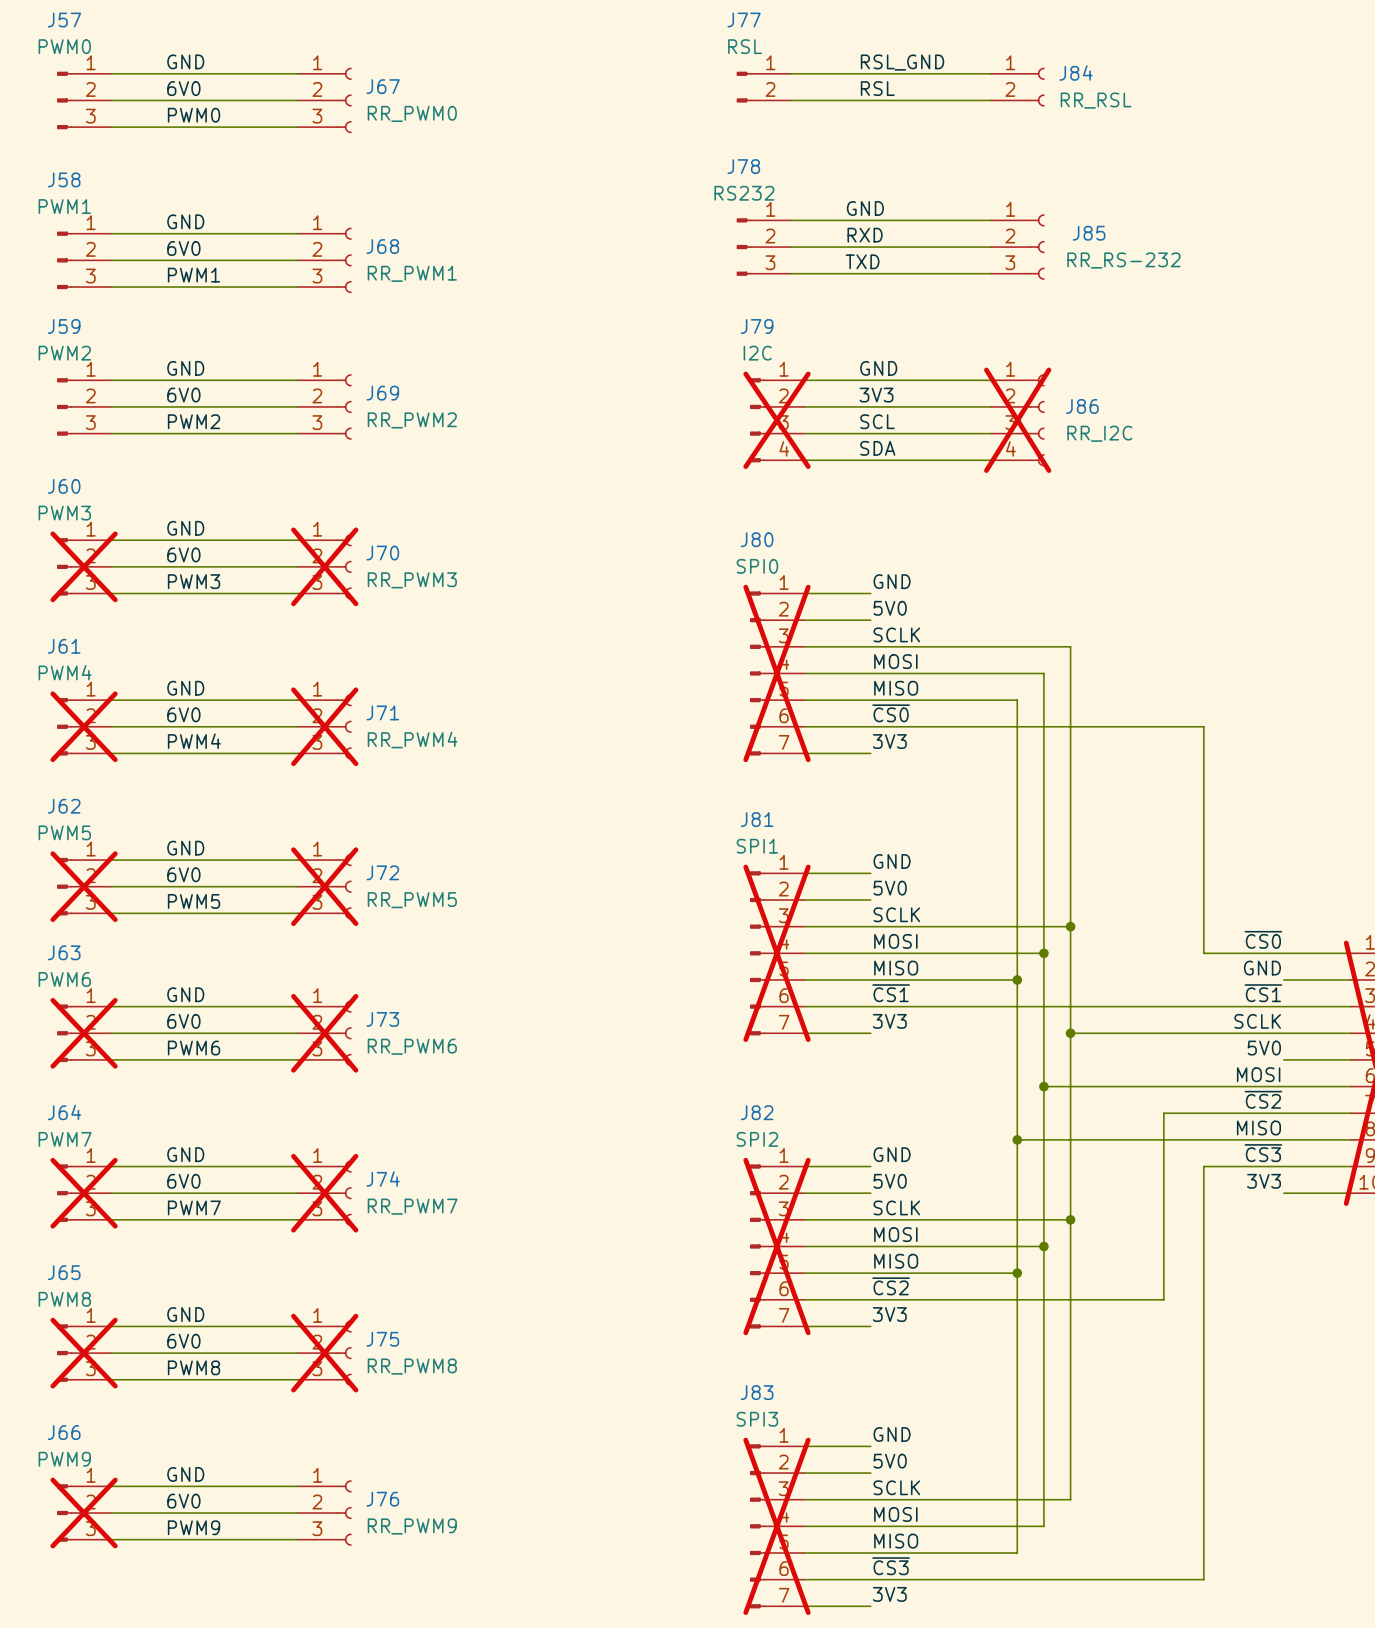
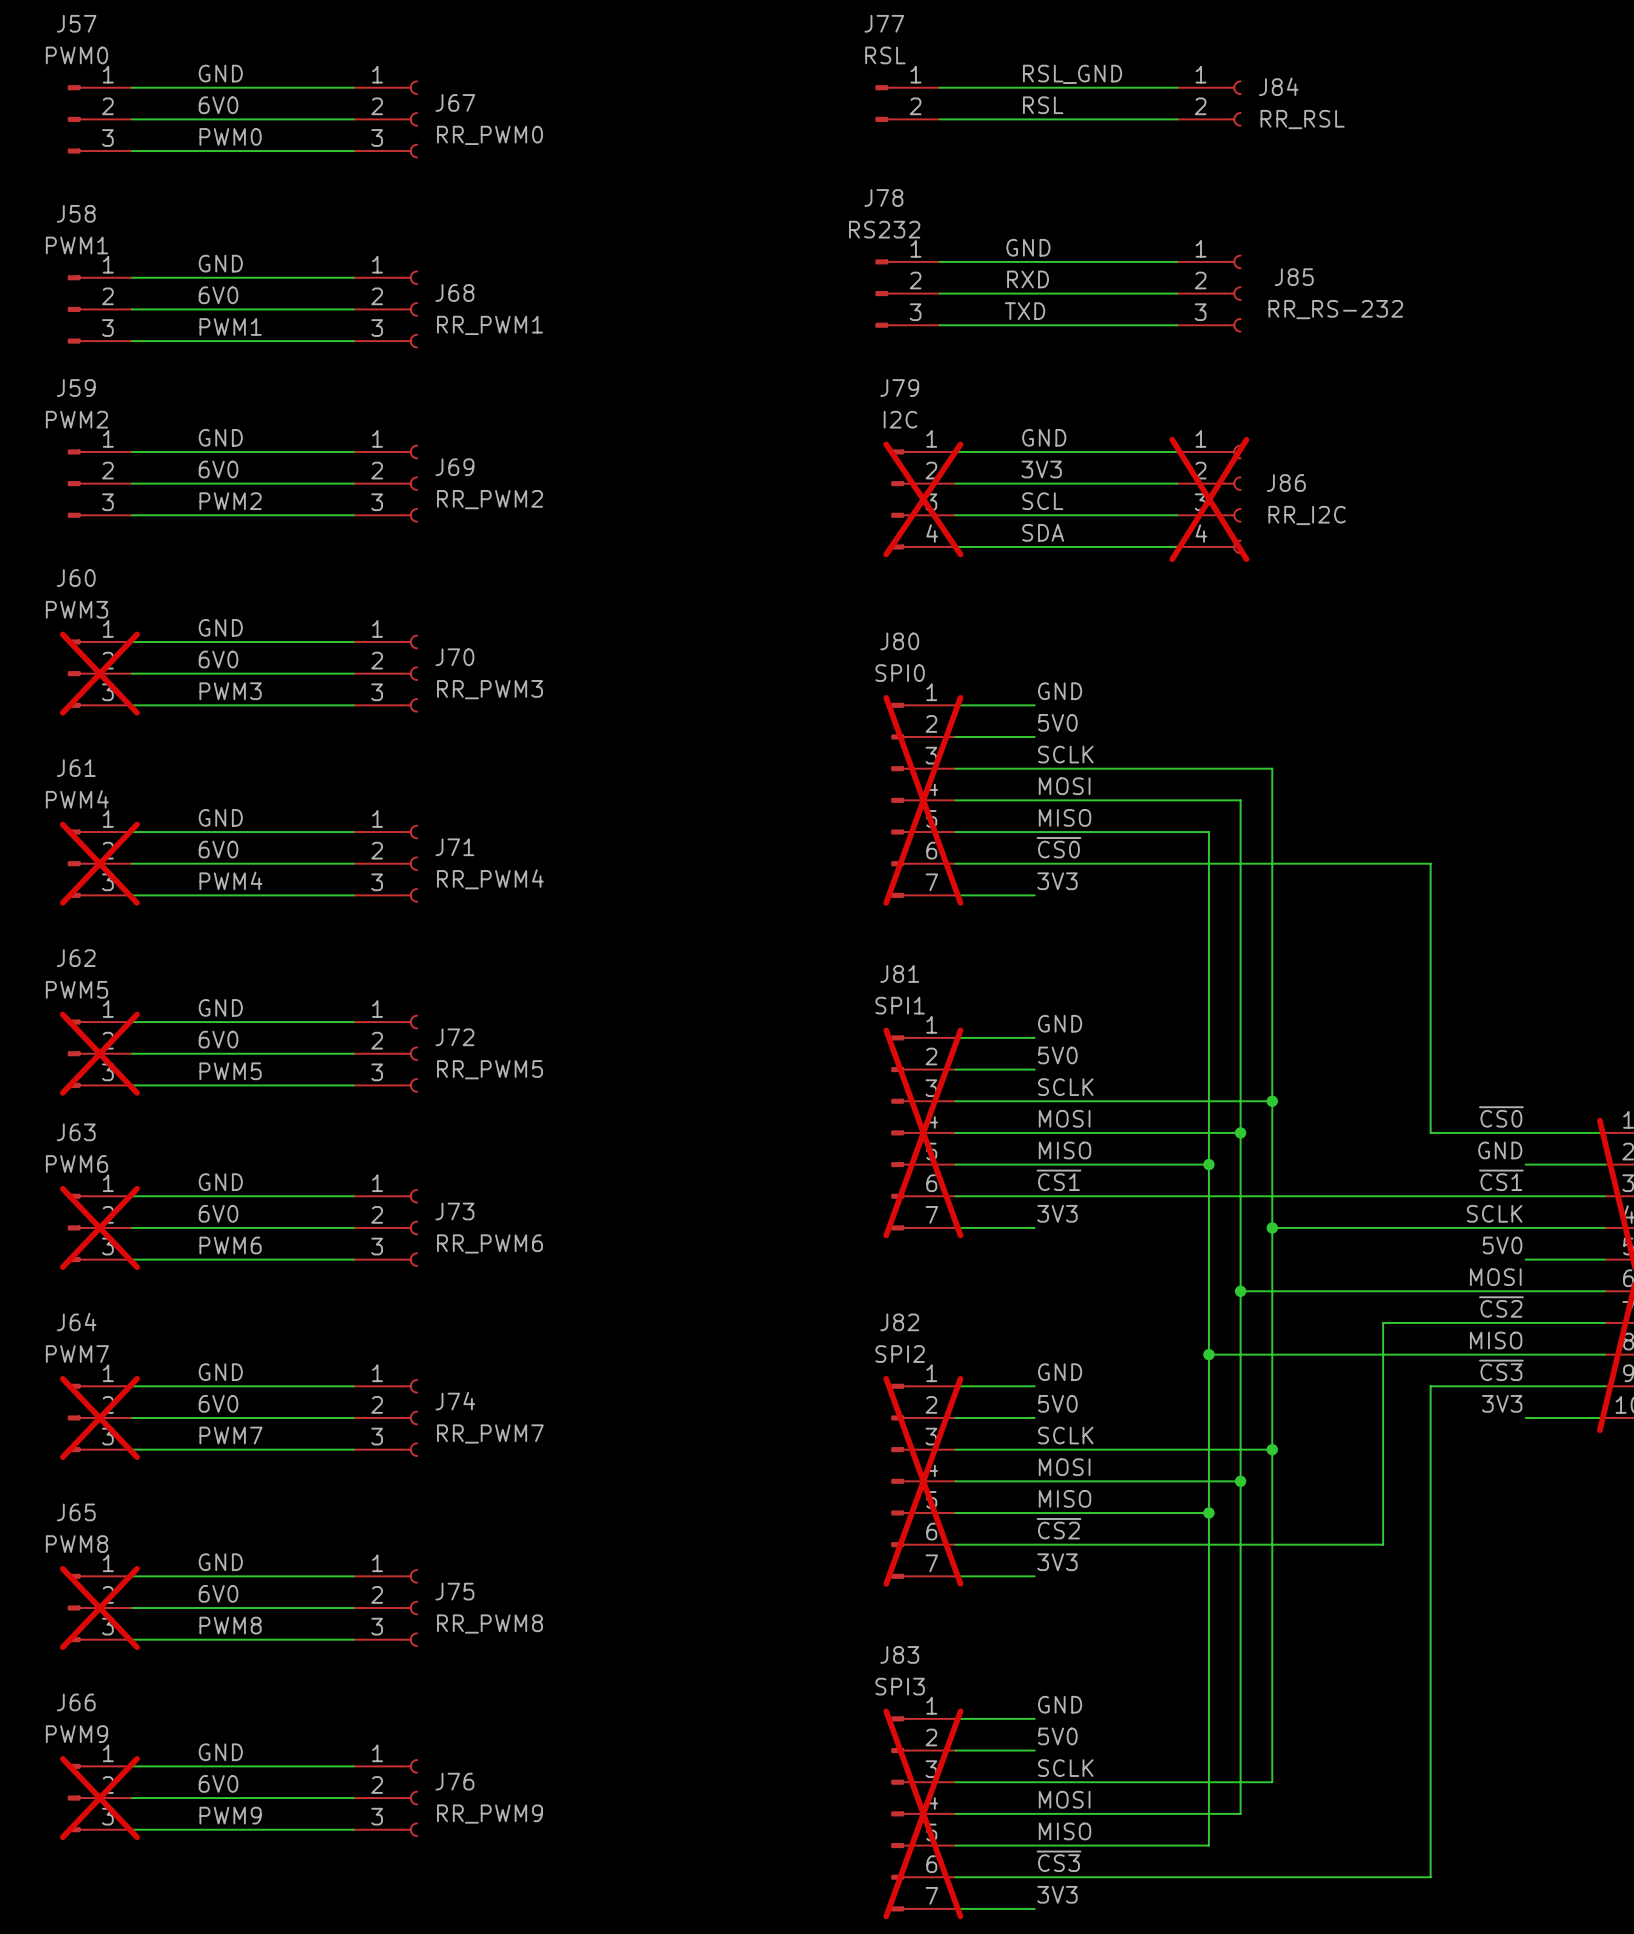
J70 do-not-place cross: (324, 566) -> none
J71 do-not-place cross: (324, 726) -> none
J72 do-not-place cross: (324, 886) -> none
J73 do-not-place cross: (324, 1033) -> none
J74 do-not-place cross: (324, 1193) -> none
J75 do-not-place cross: (324, 1353) -> none

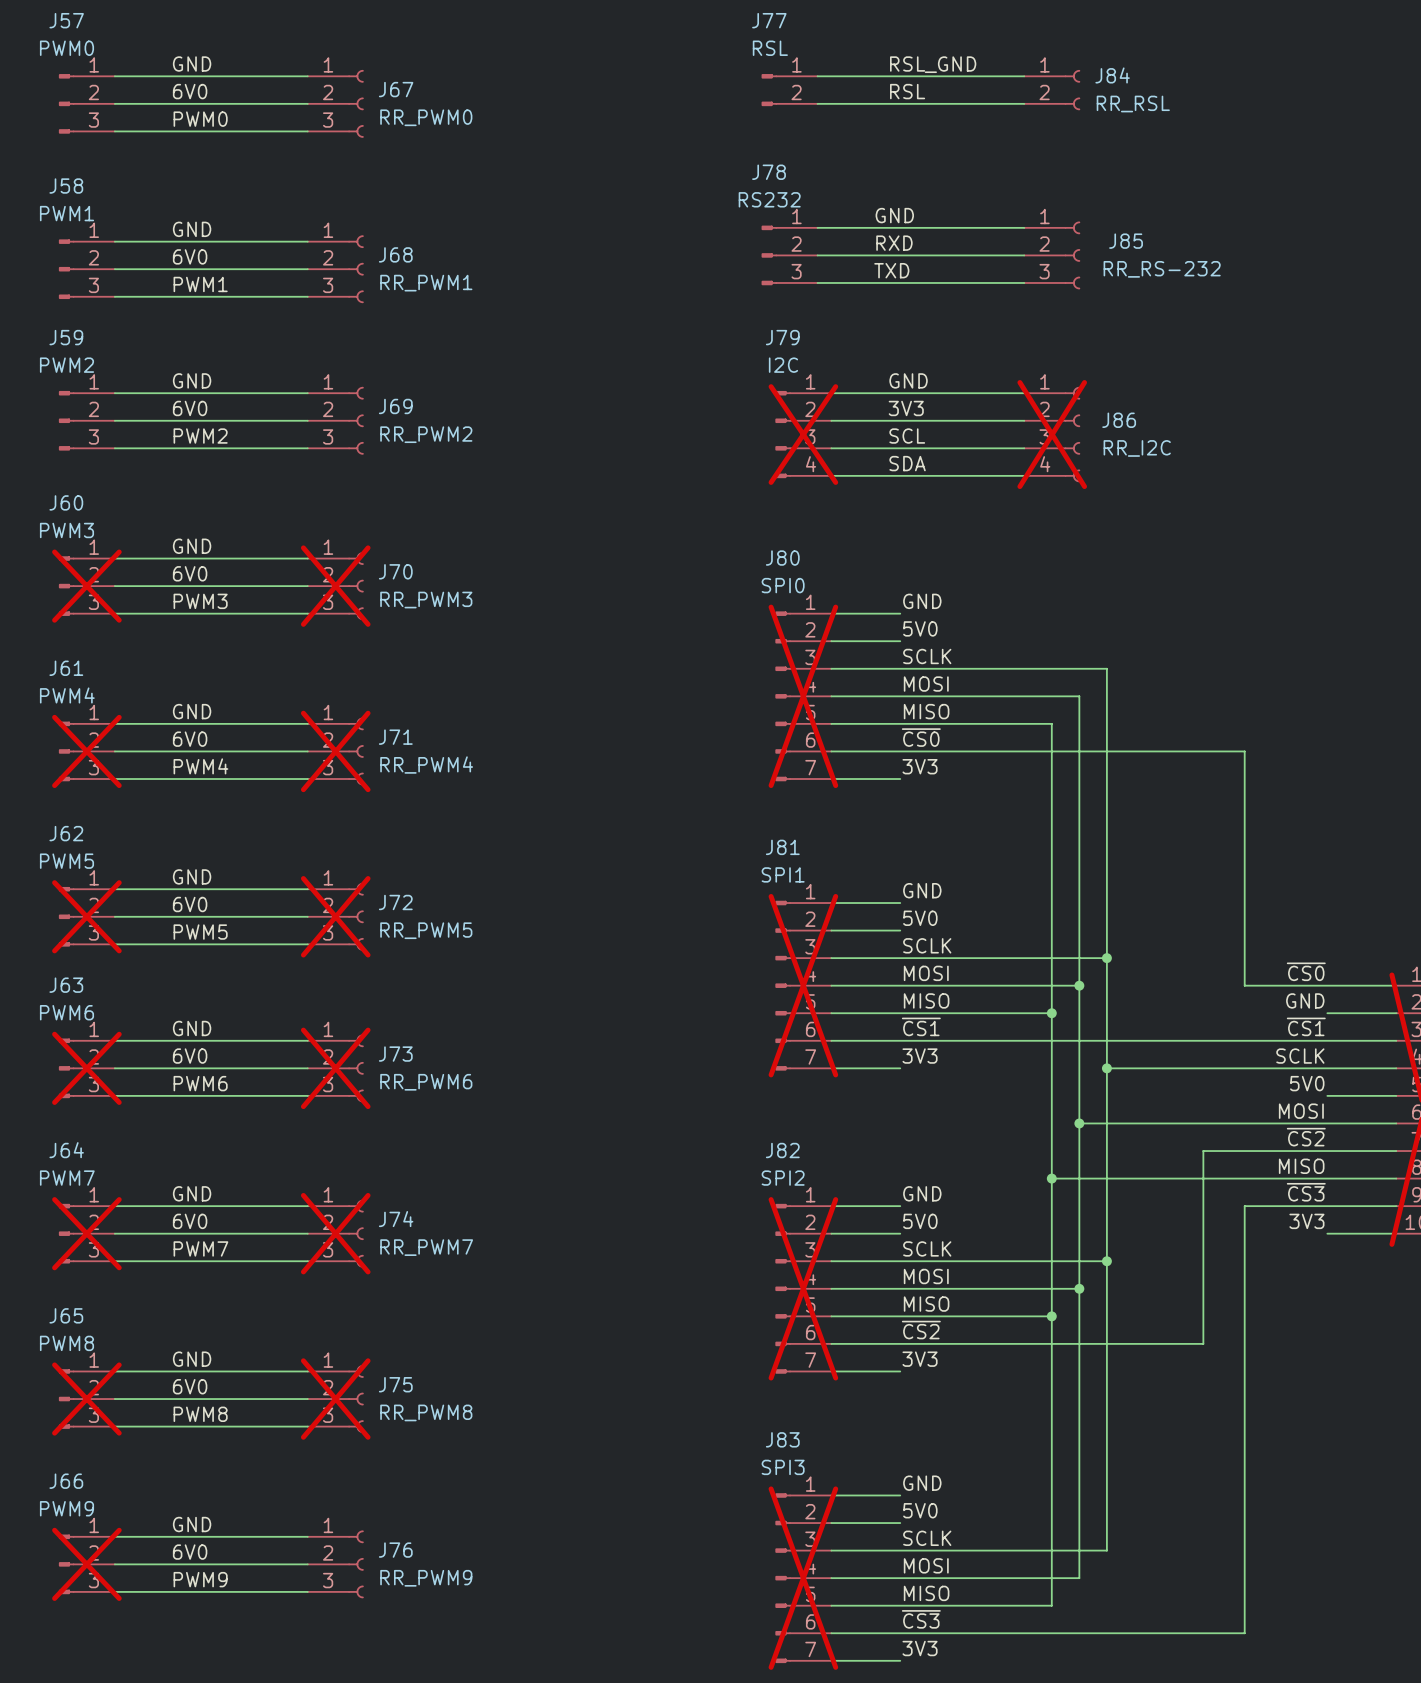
J70 do-not-place cross: none -> (335, 586)
J71 do-not-place cross: none -> (335, 751)
J72 do-not-place cross: none -> (335, 916)
J73 do-not-place cross: none -> (335, 1068)
J74 do-not-place cross: none -> (335, 1233)
J75 do-not-place cross: none -> (335, 1399)

